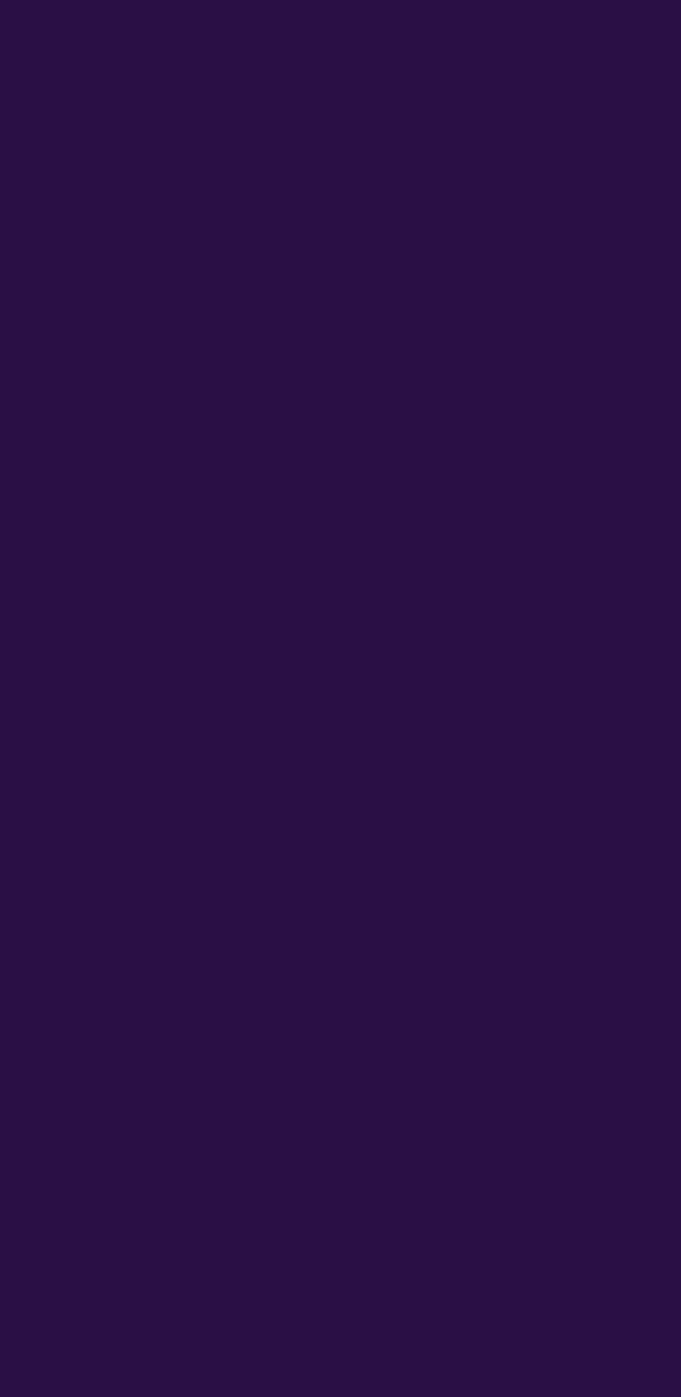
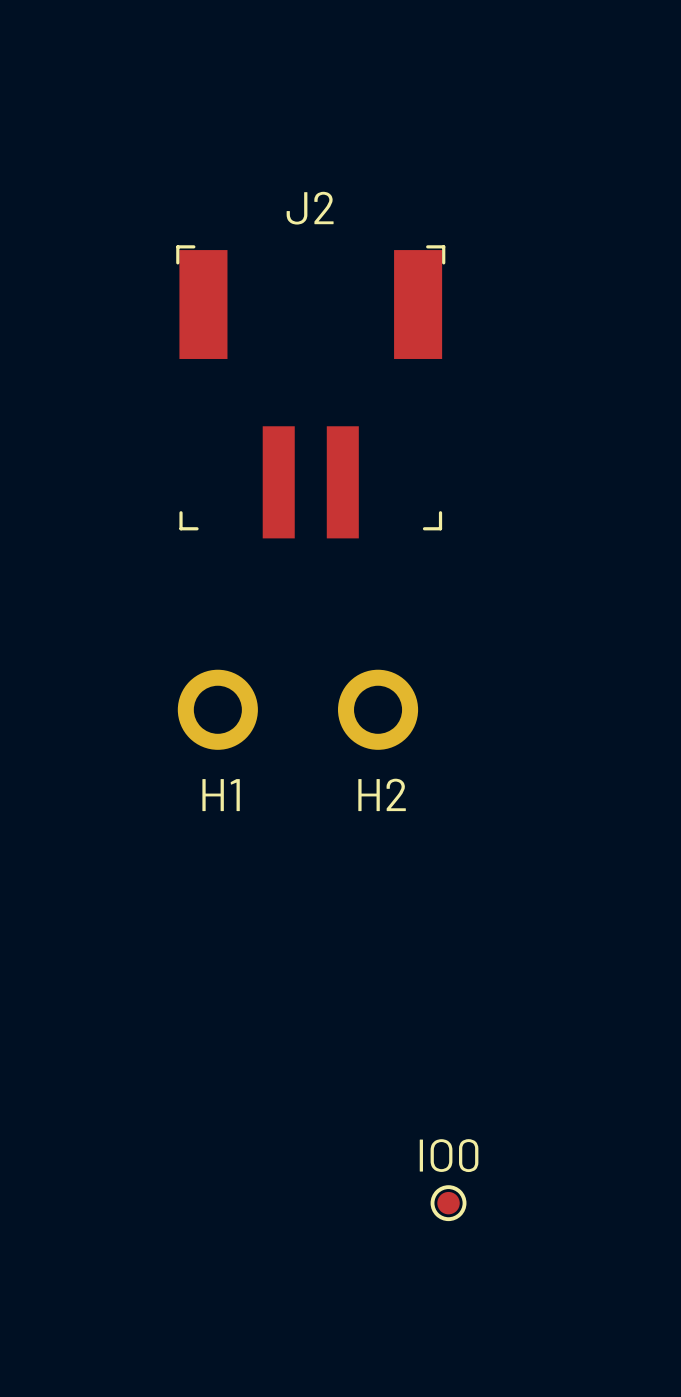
J2: none -> (310, 391)
H1: none -> (217, 709)
H2: none -> (378, 709)
IO0: none -> (448, 1203)

